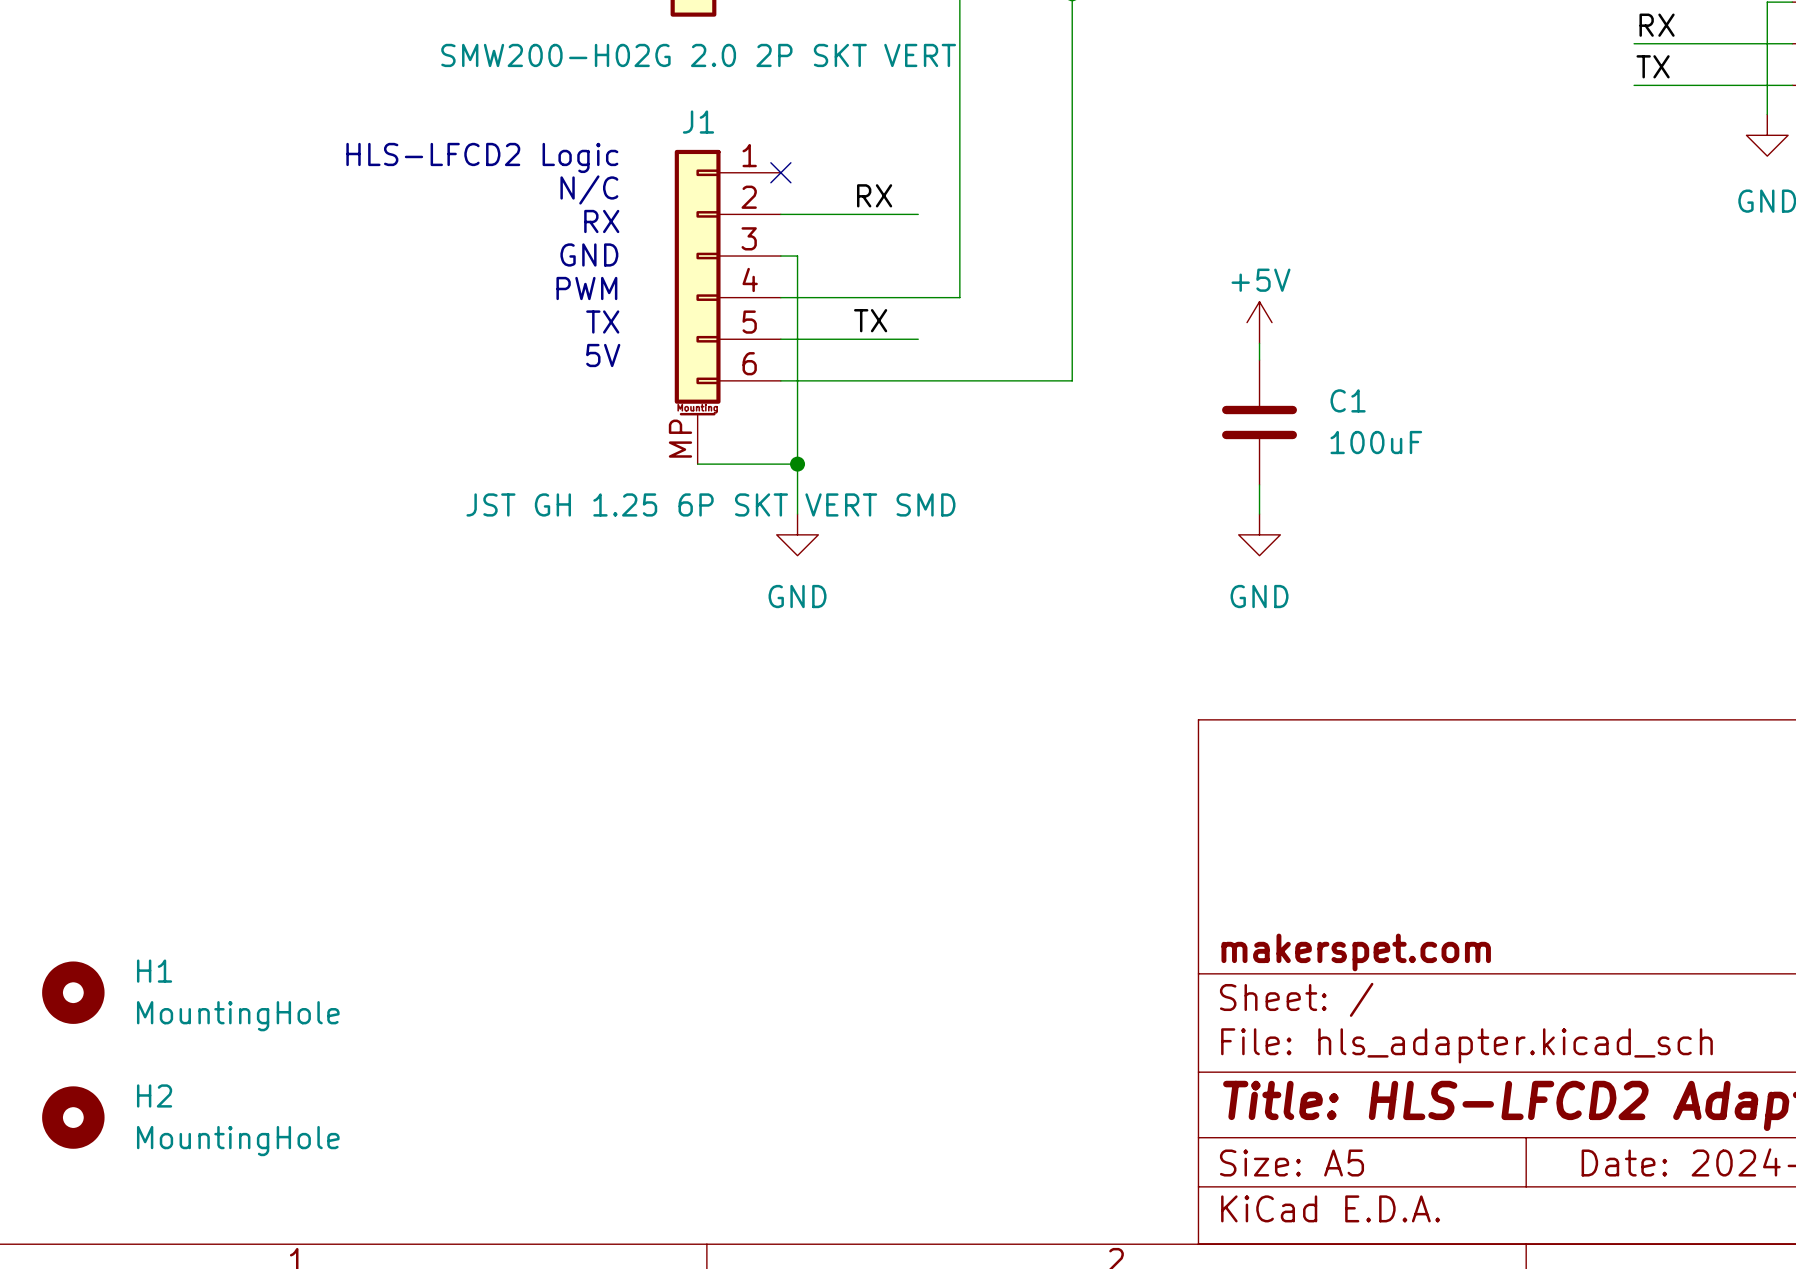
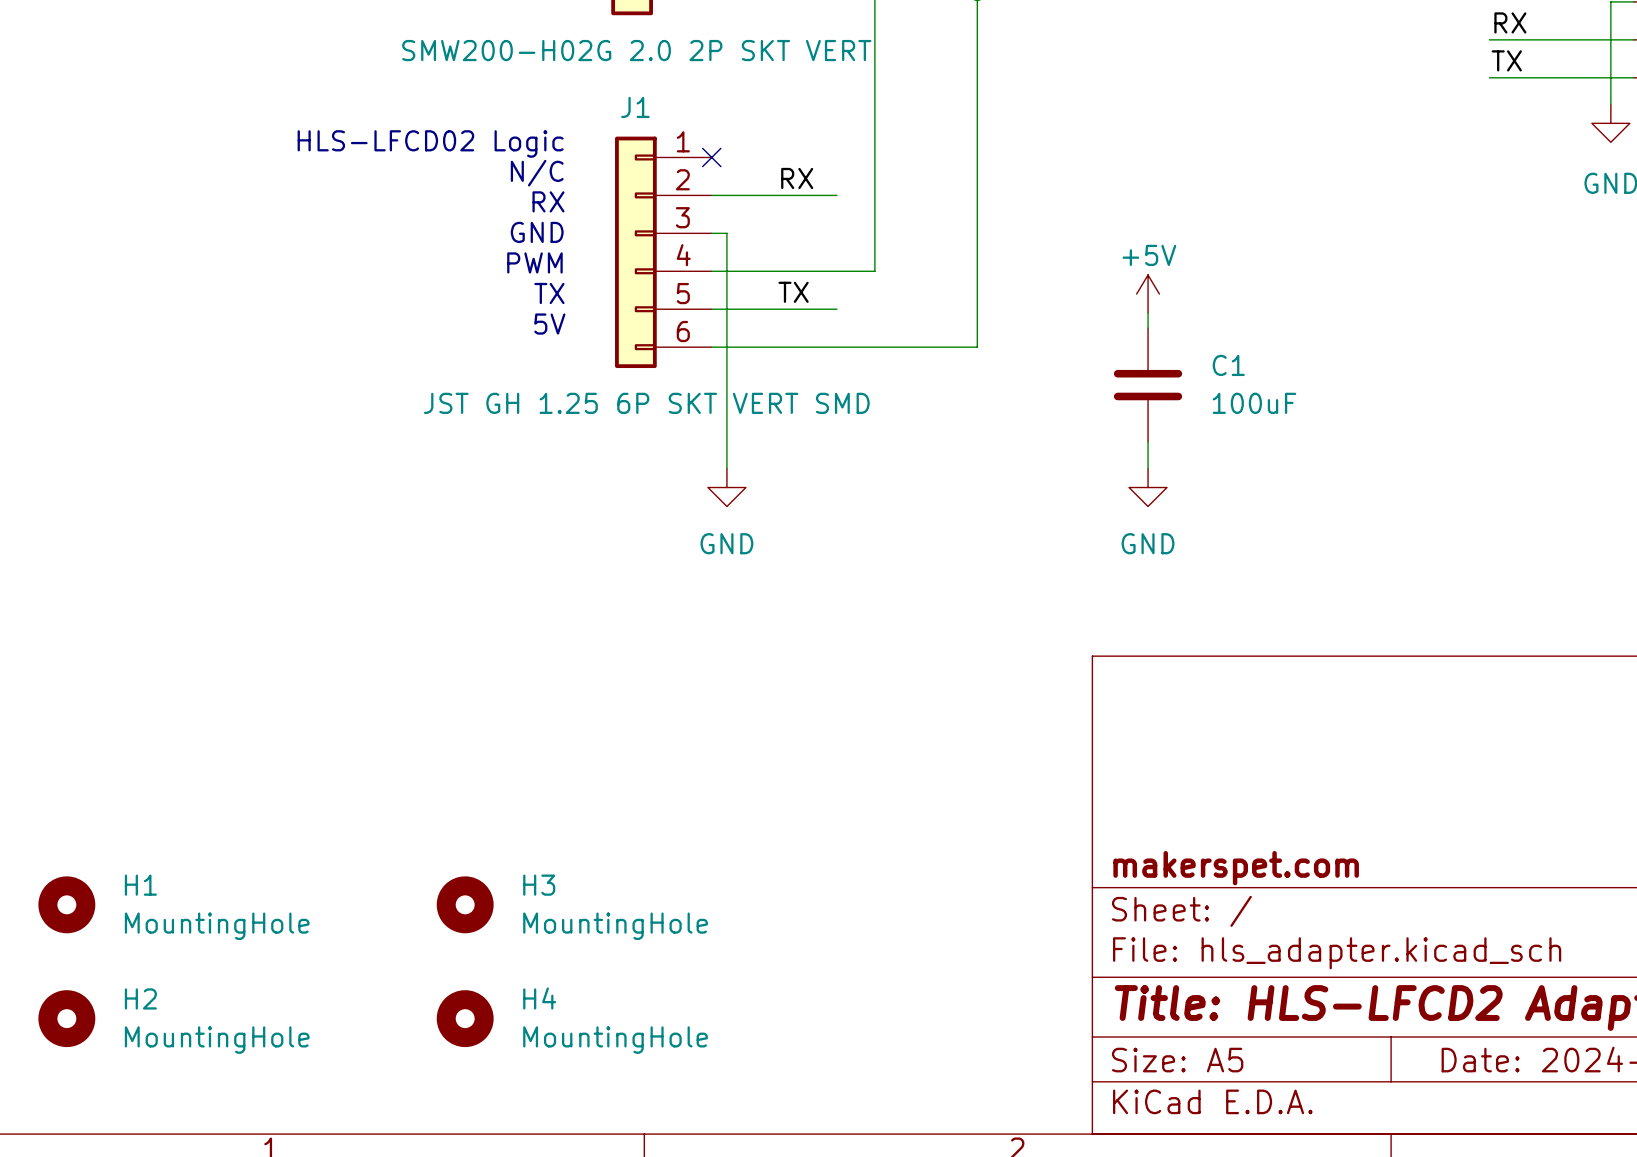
J1 symbol: [674, 149, 781, 465] -> [615, 136, 712, 369]
text: HLS-LFCD2 Logic (482, 157) -> HLS-LFCD02 Logic (430, 143)
wire: (697, 464) (797, 464) -> none
junction: (797, 464) -> none
J1 value position: JST GH 1.25 6P SKT VERT SMD (710, 504) -> JST GH 1.25 6P SKT VERT SMD (646, 403)
H3: none -> MountingHole (465, 904)
H4: none -> MountingHole (465, 1018)

